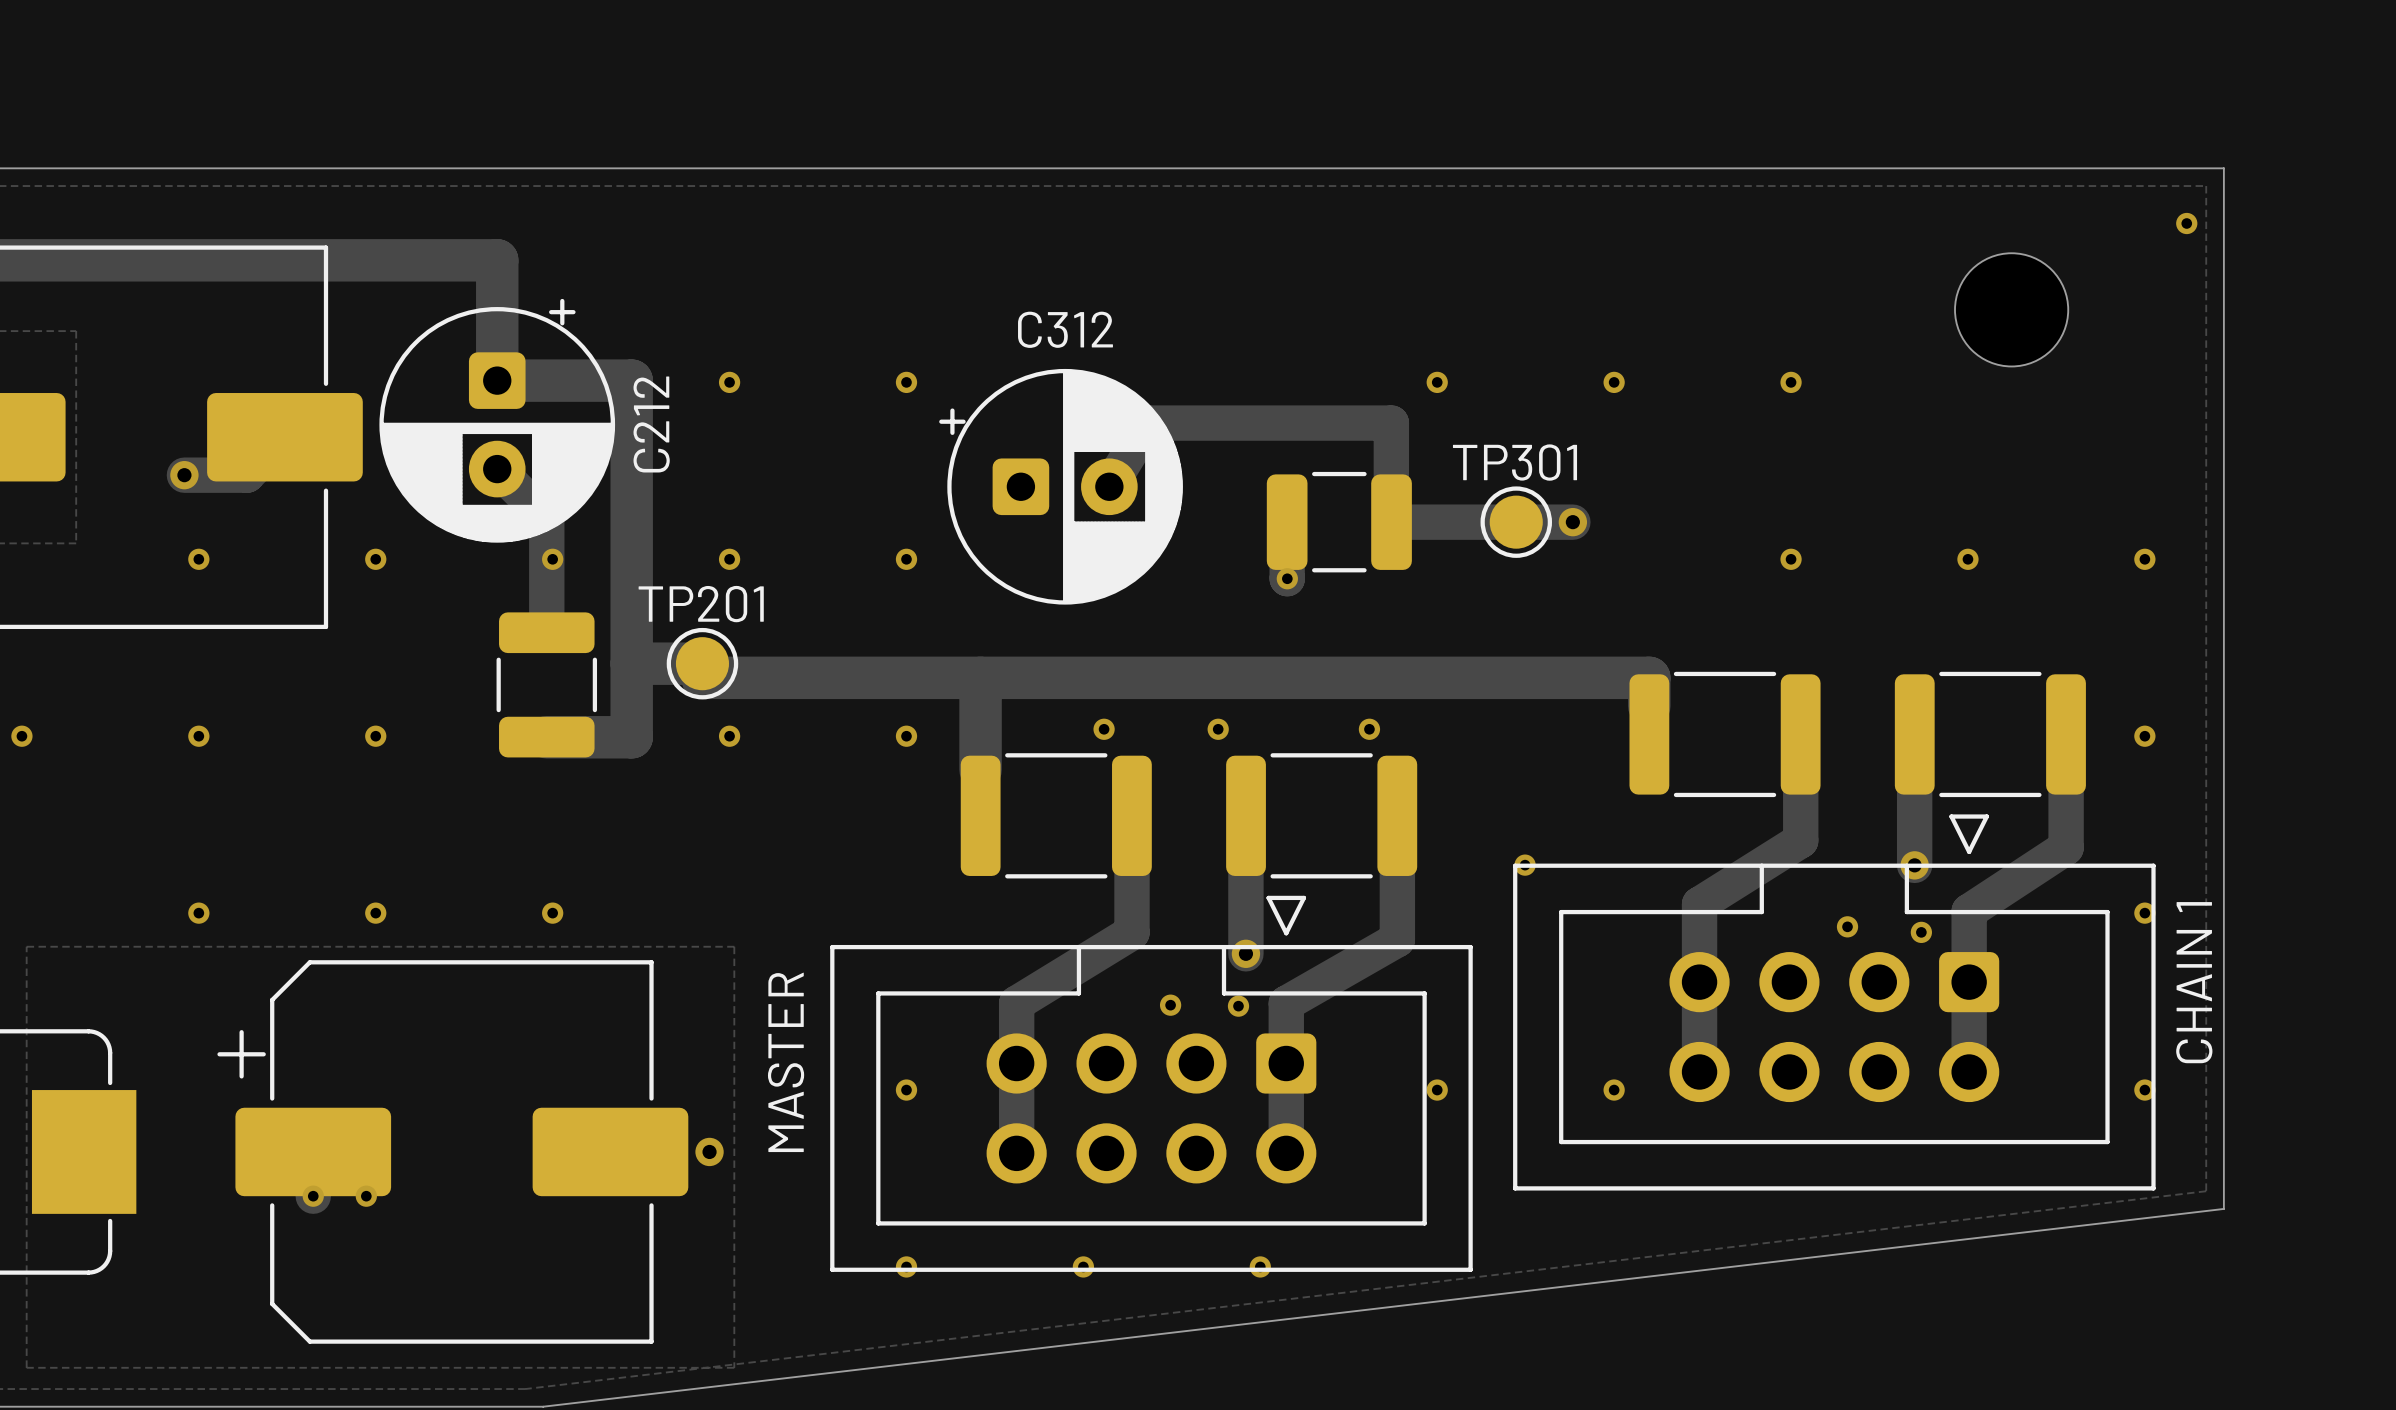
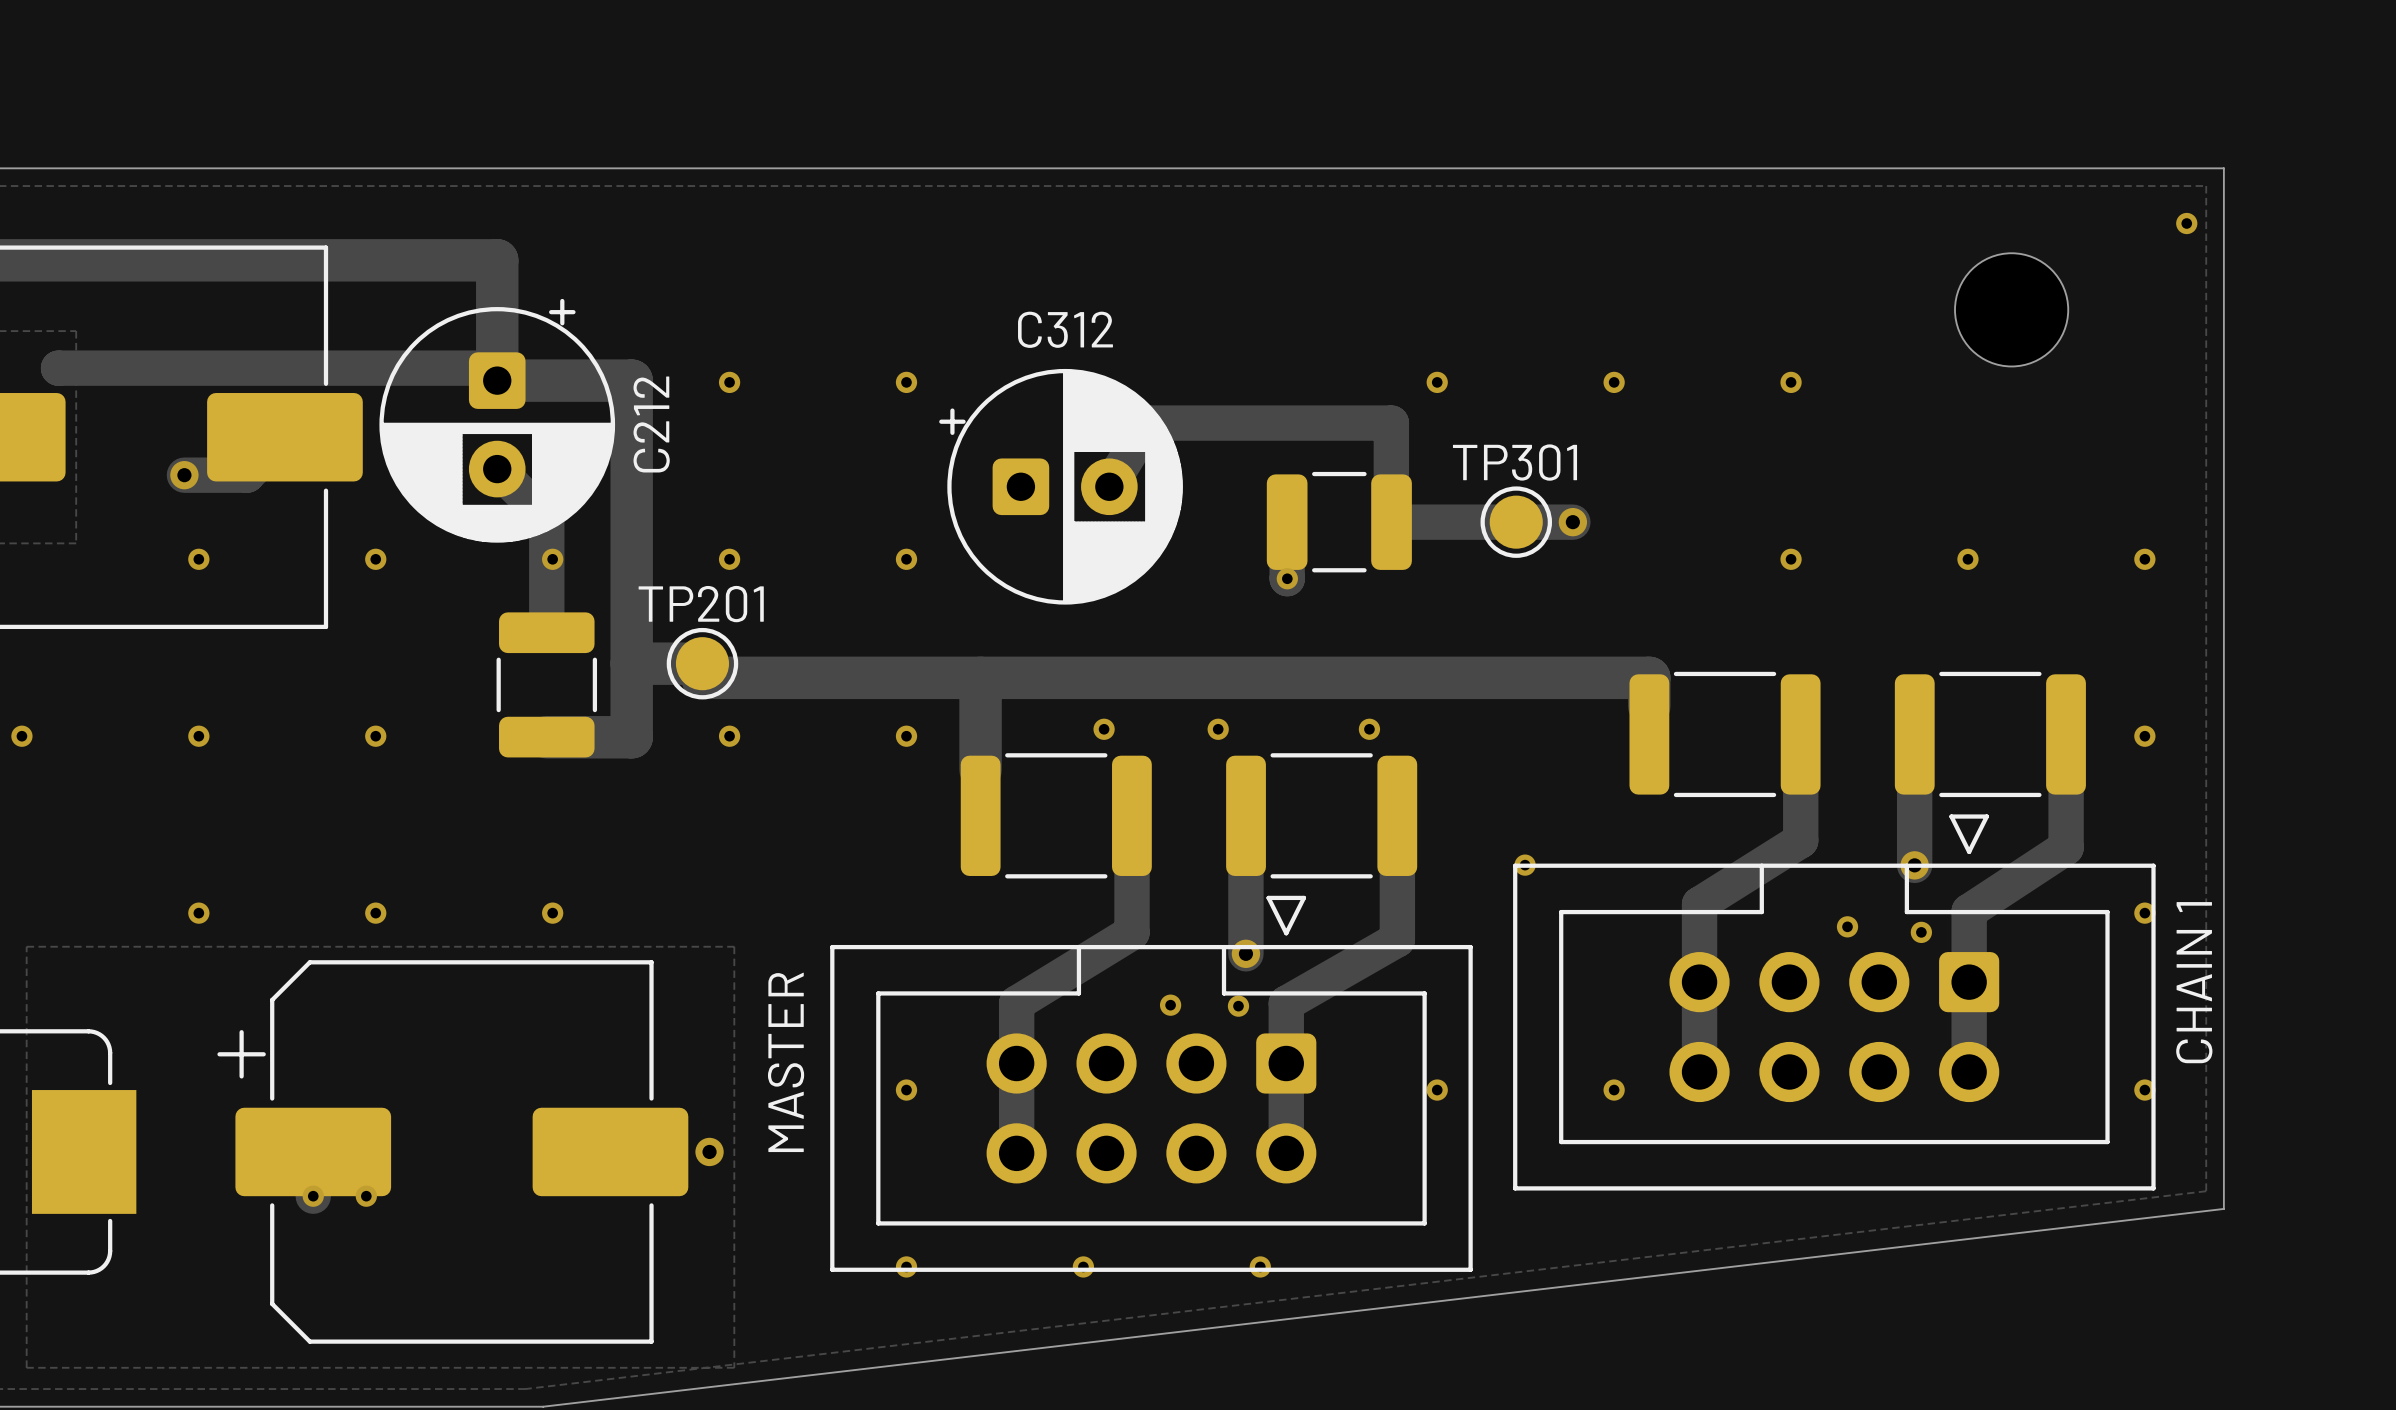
track: none -> (58, 368) (484, 368) (497, 380)

